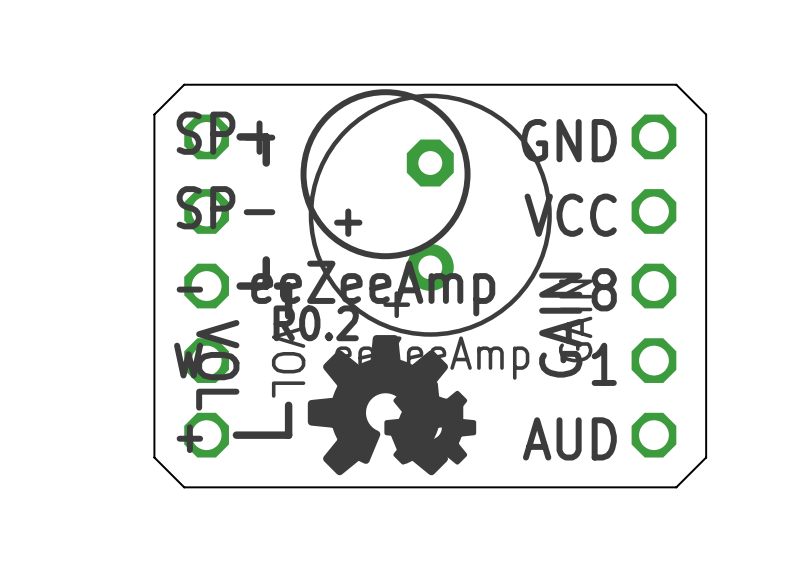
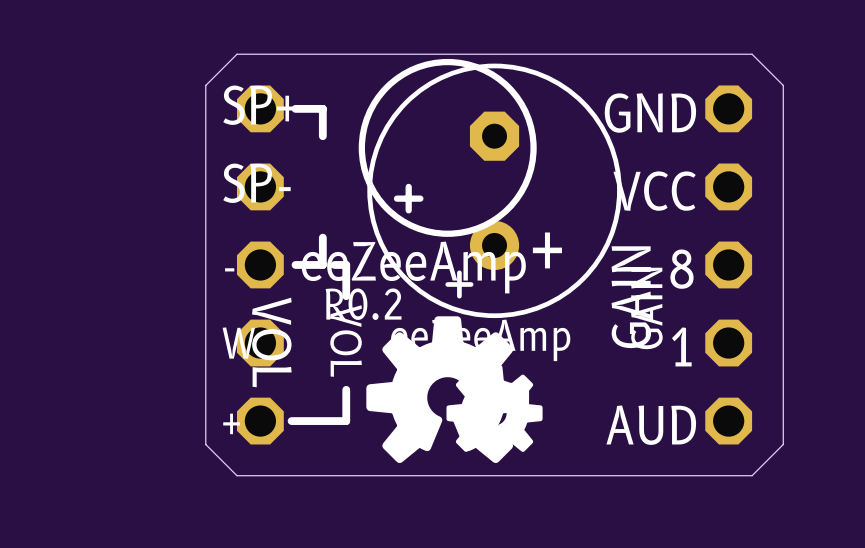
text: none -> + (547, 250)

